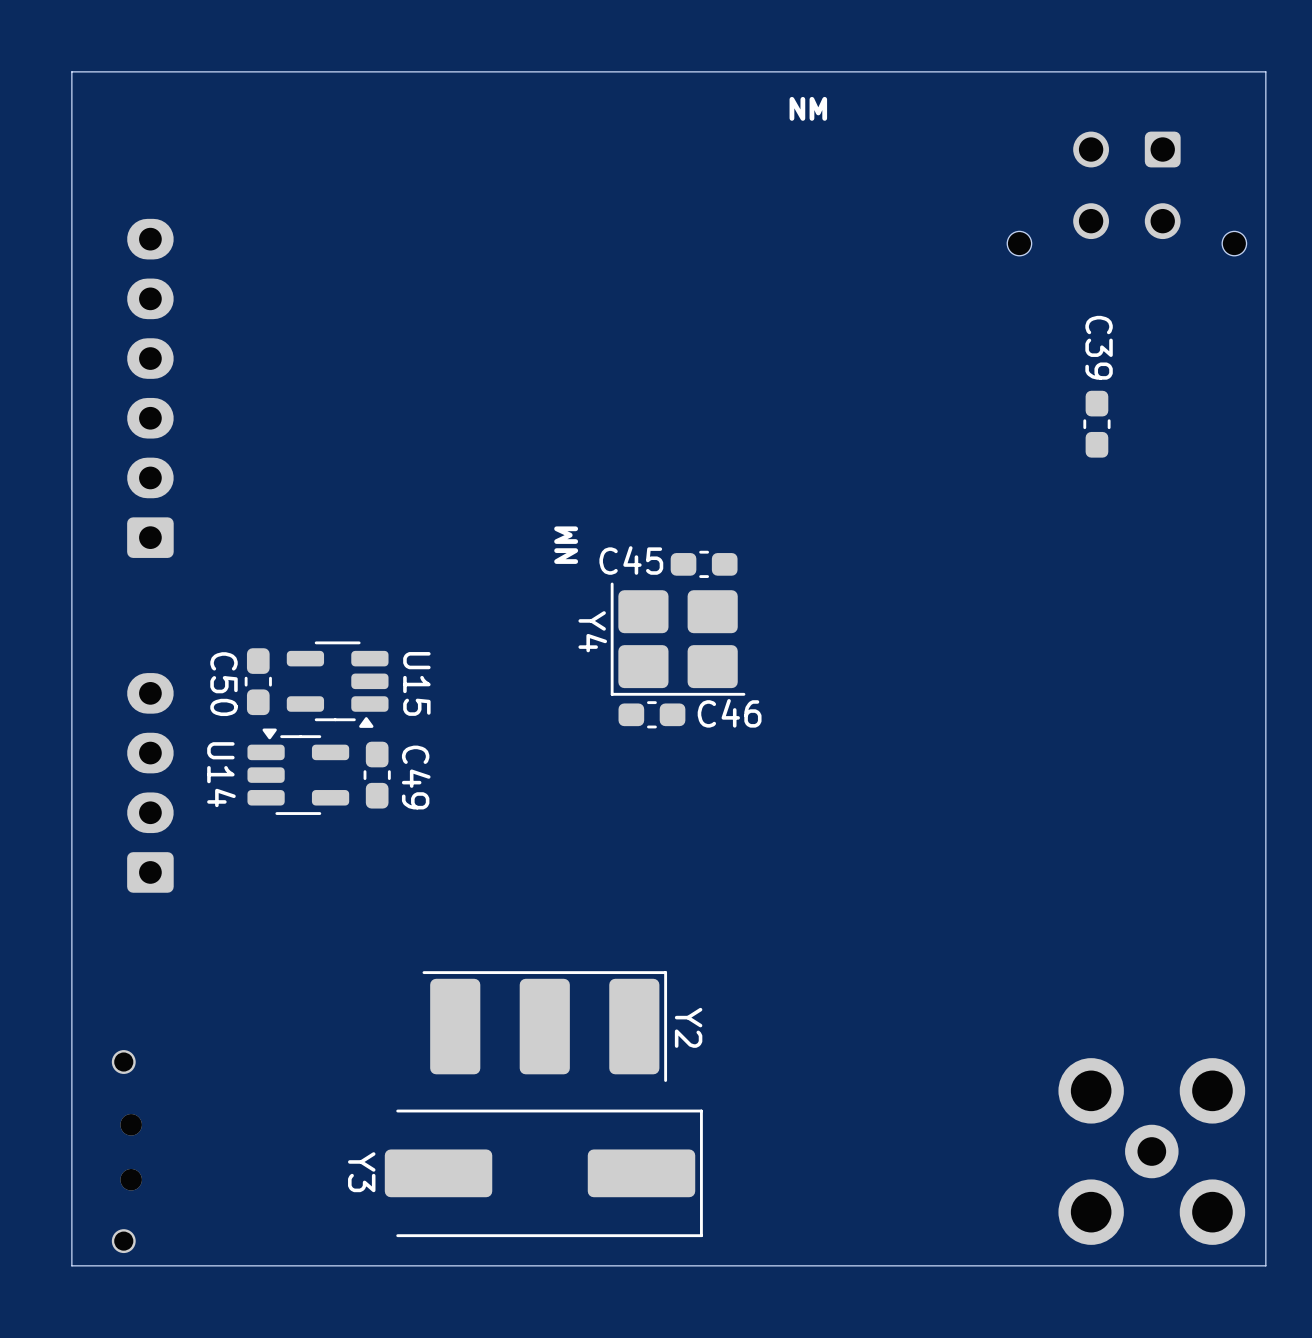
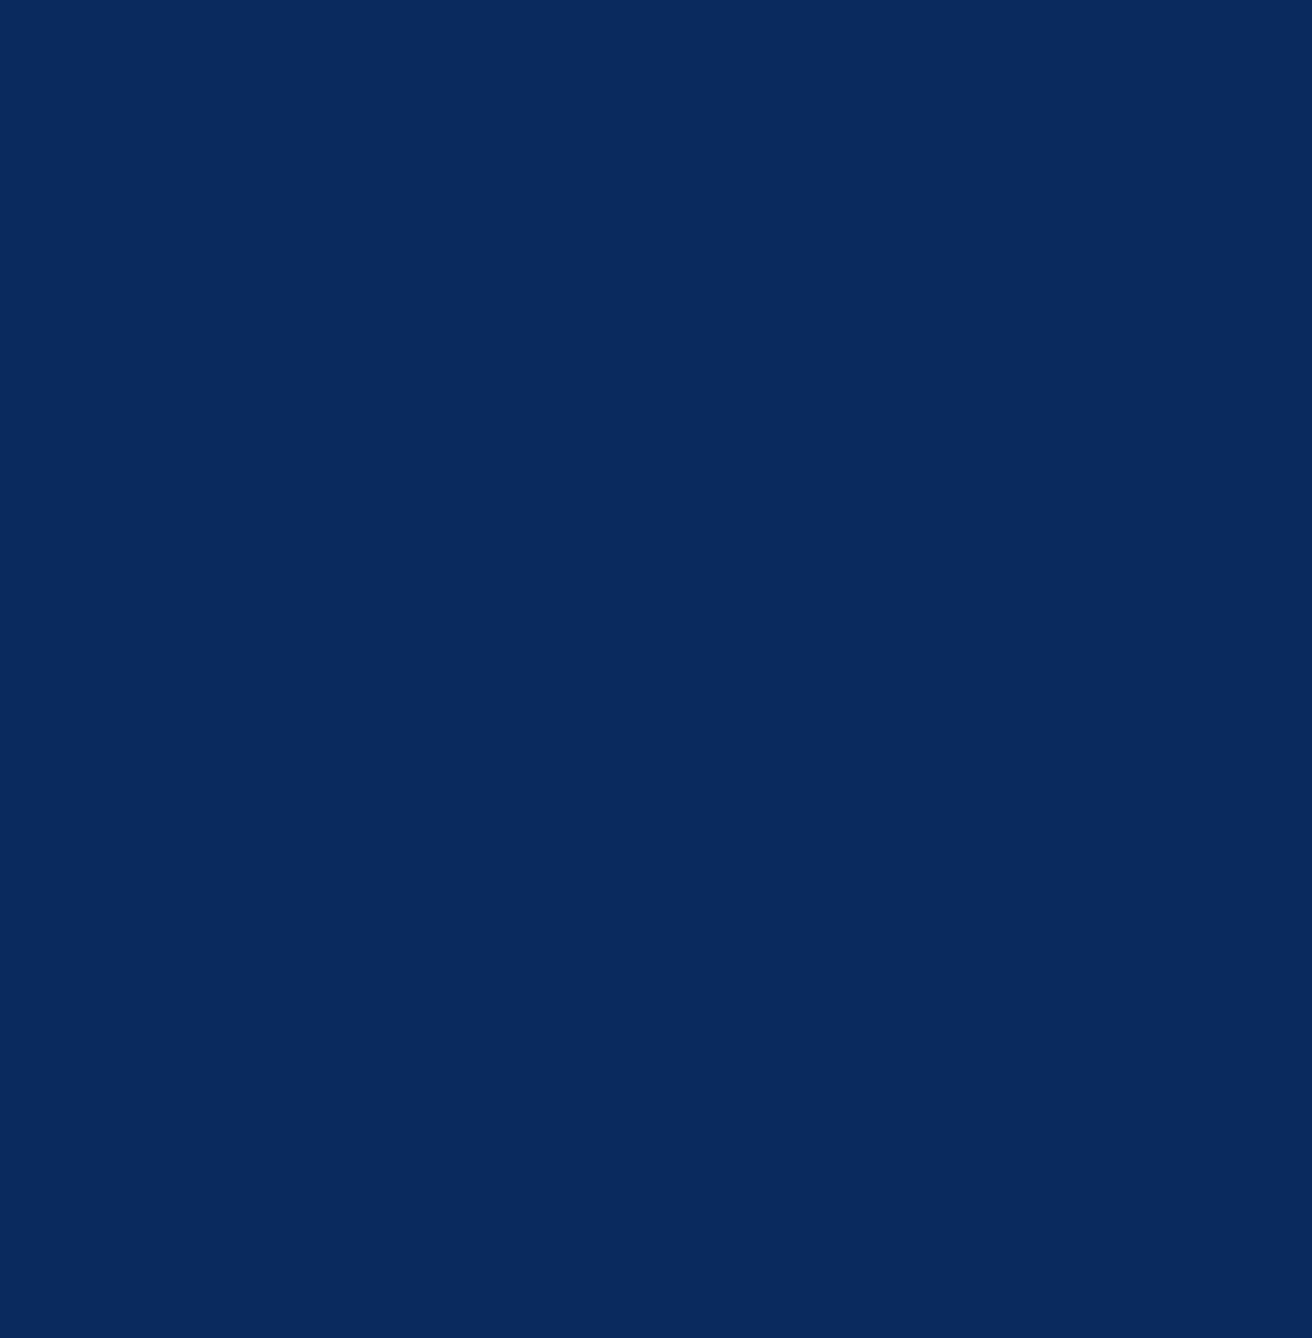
board edge: (1265, 71) (71, 71) (71, 1265) (1265, 1265) (1265, 71) -> none
text: NM (808, 108) -> none
part: (1126, 193) -> none
part: (150, 388) -> none
C39: (1096, 424) -> none
text: NM (566, 545) -> none
C45: (704, 564) -> none
Y4: (678, 639) -> none
C50: (258, 681) -> none
U15: (337, 684) -> none
C46: (651, 714) -> none
U14: (298, 771) -> none
C49: (377, 775) -> none
part: (150, 782) -> none
Y2: (544, 1026) -> none
part: (126, 1151) -> none
part: (1151, 1151) -> none
Y3: (543, 1173) -> none

